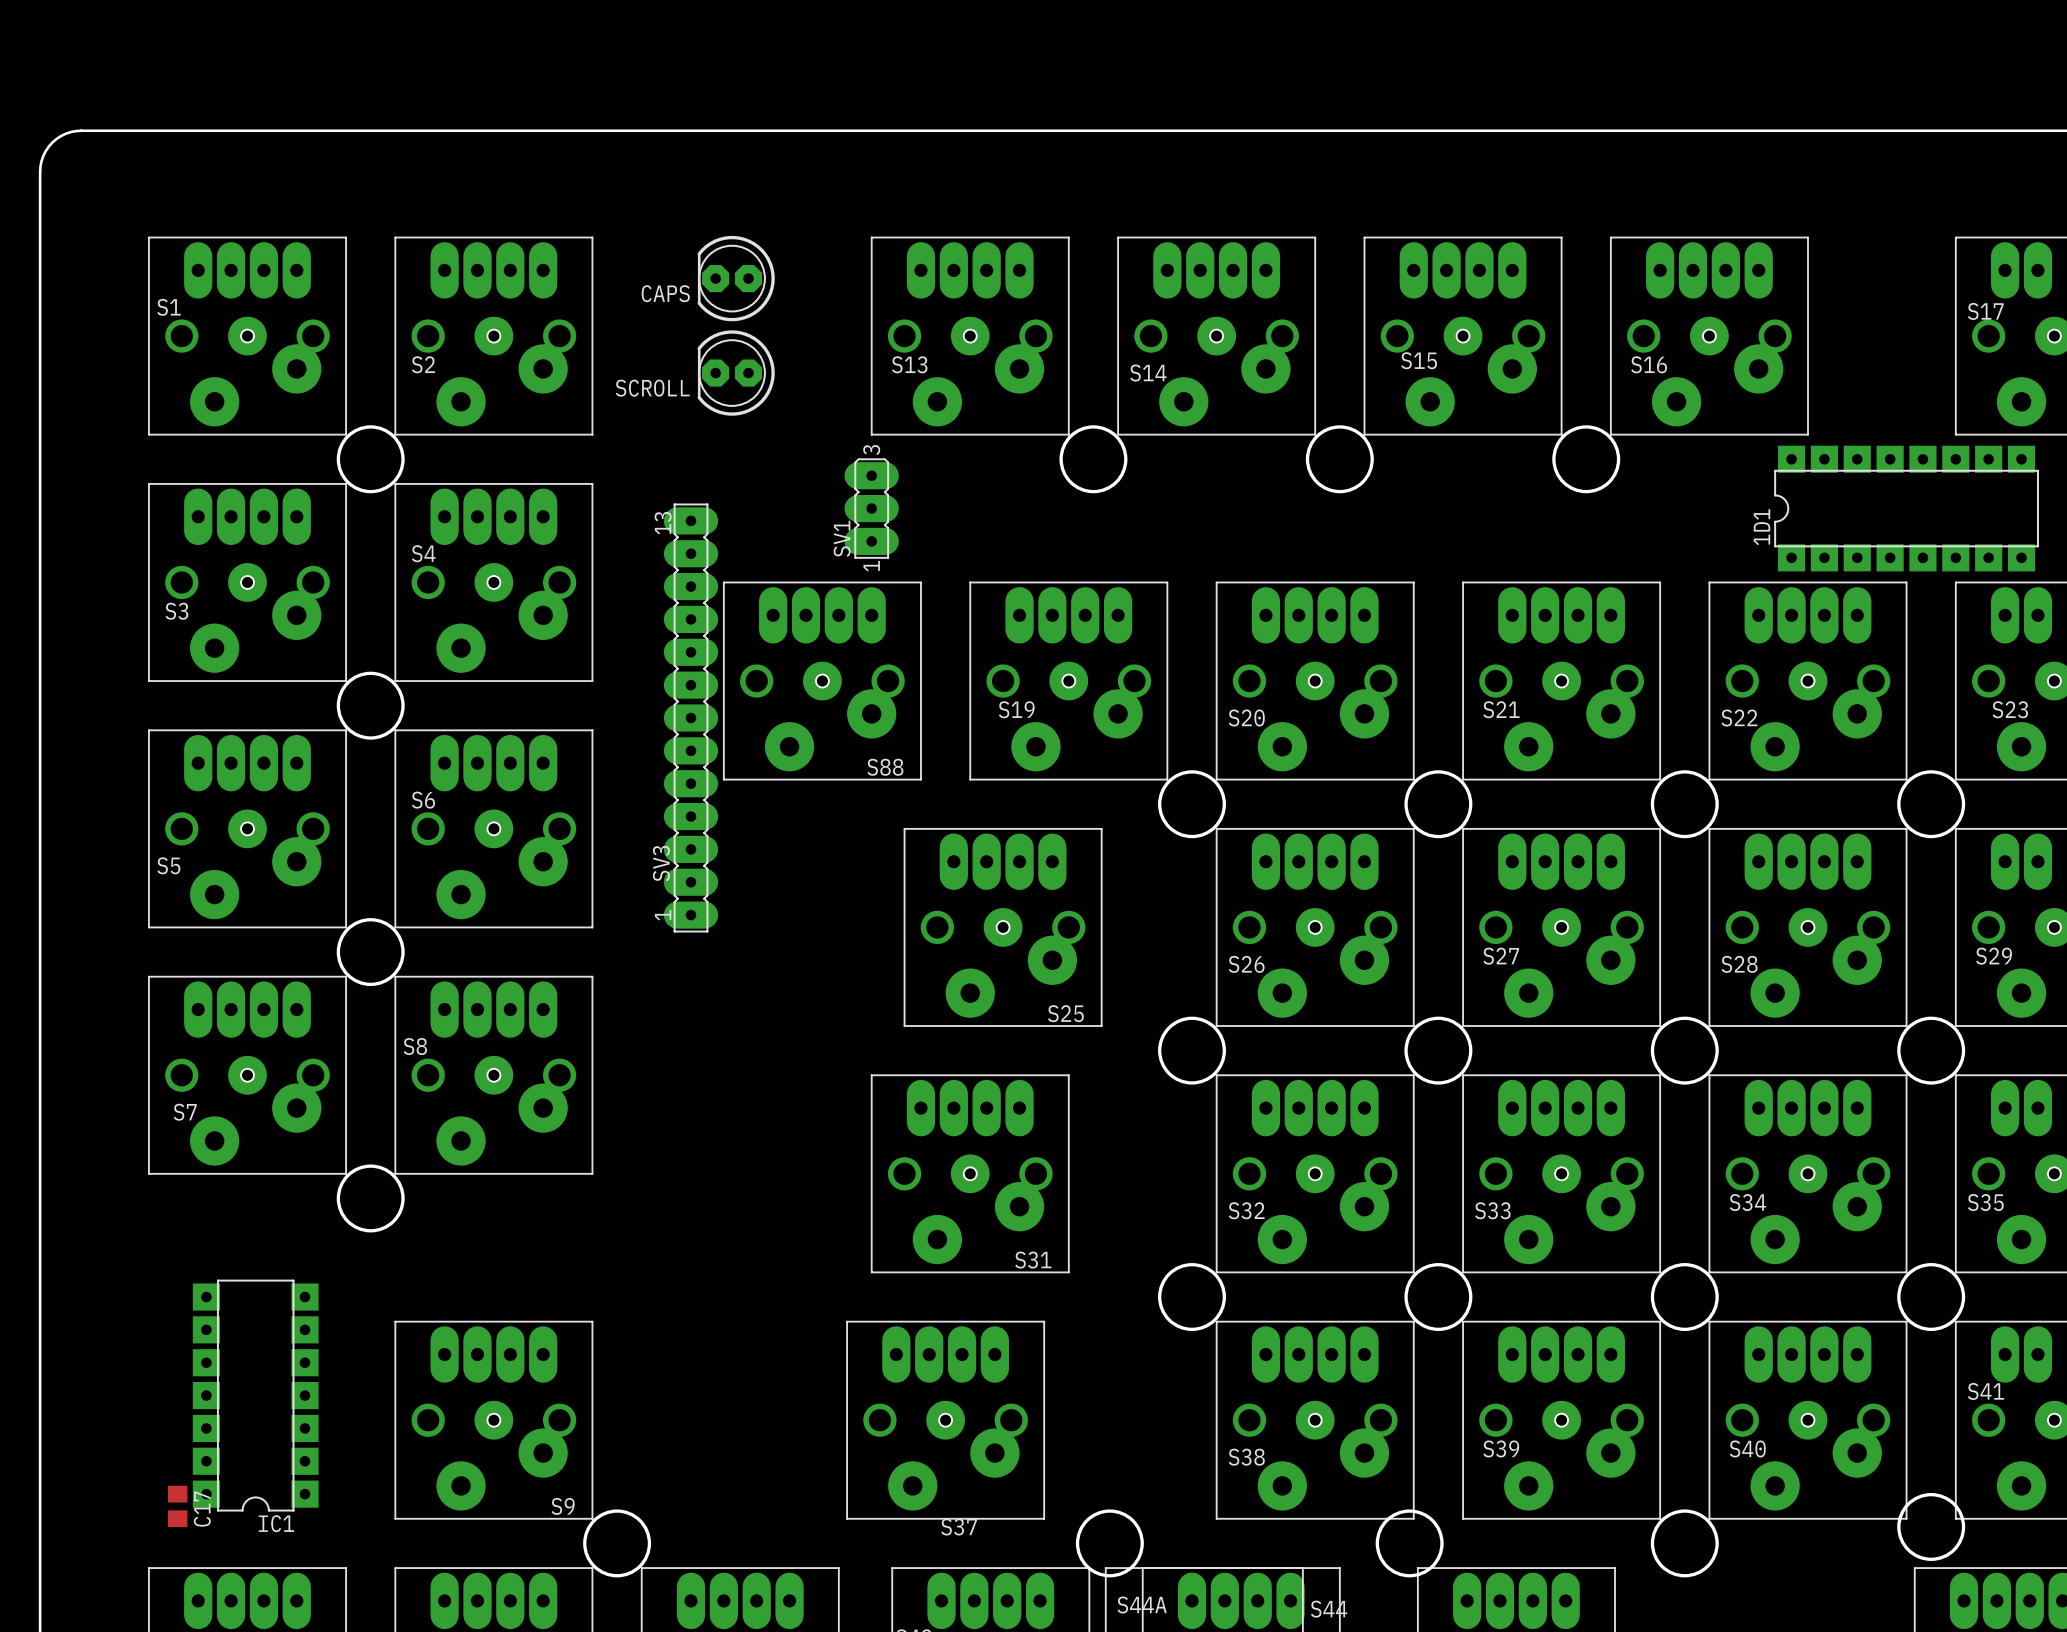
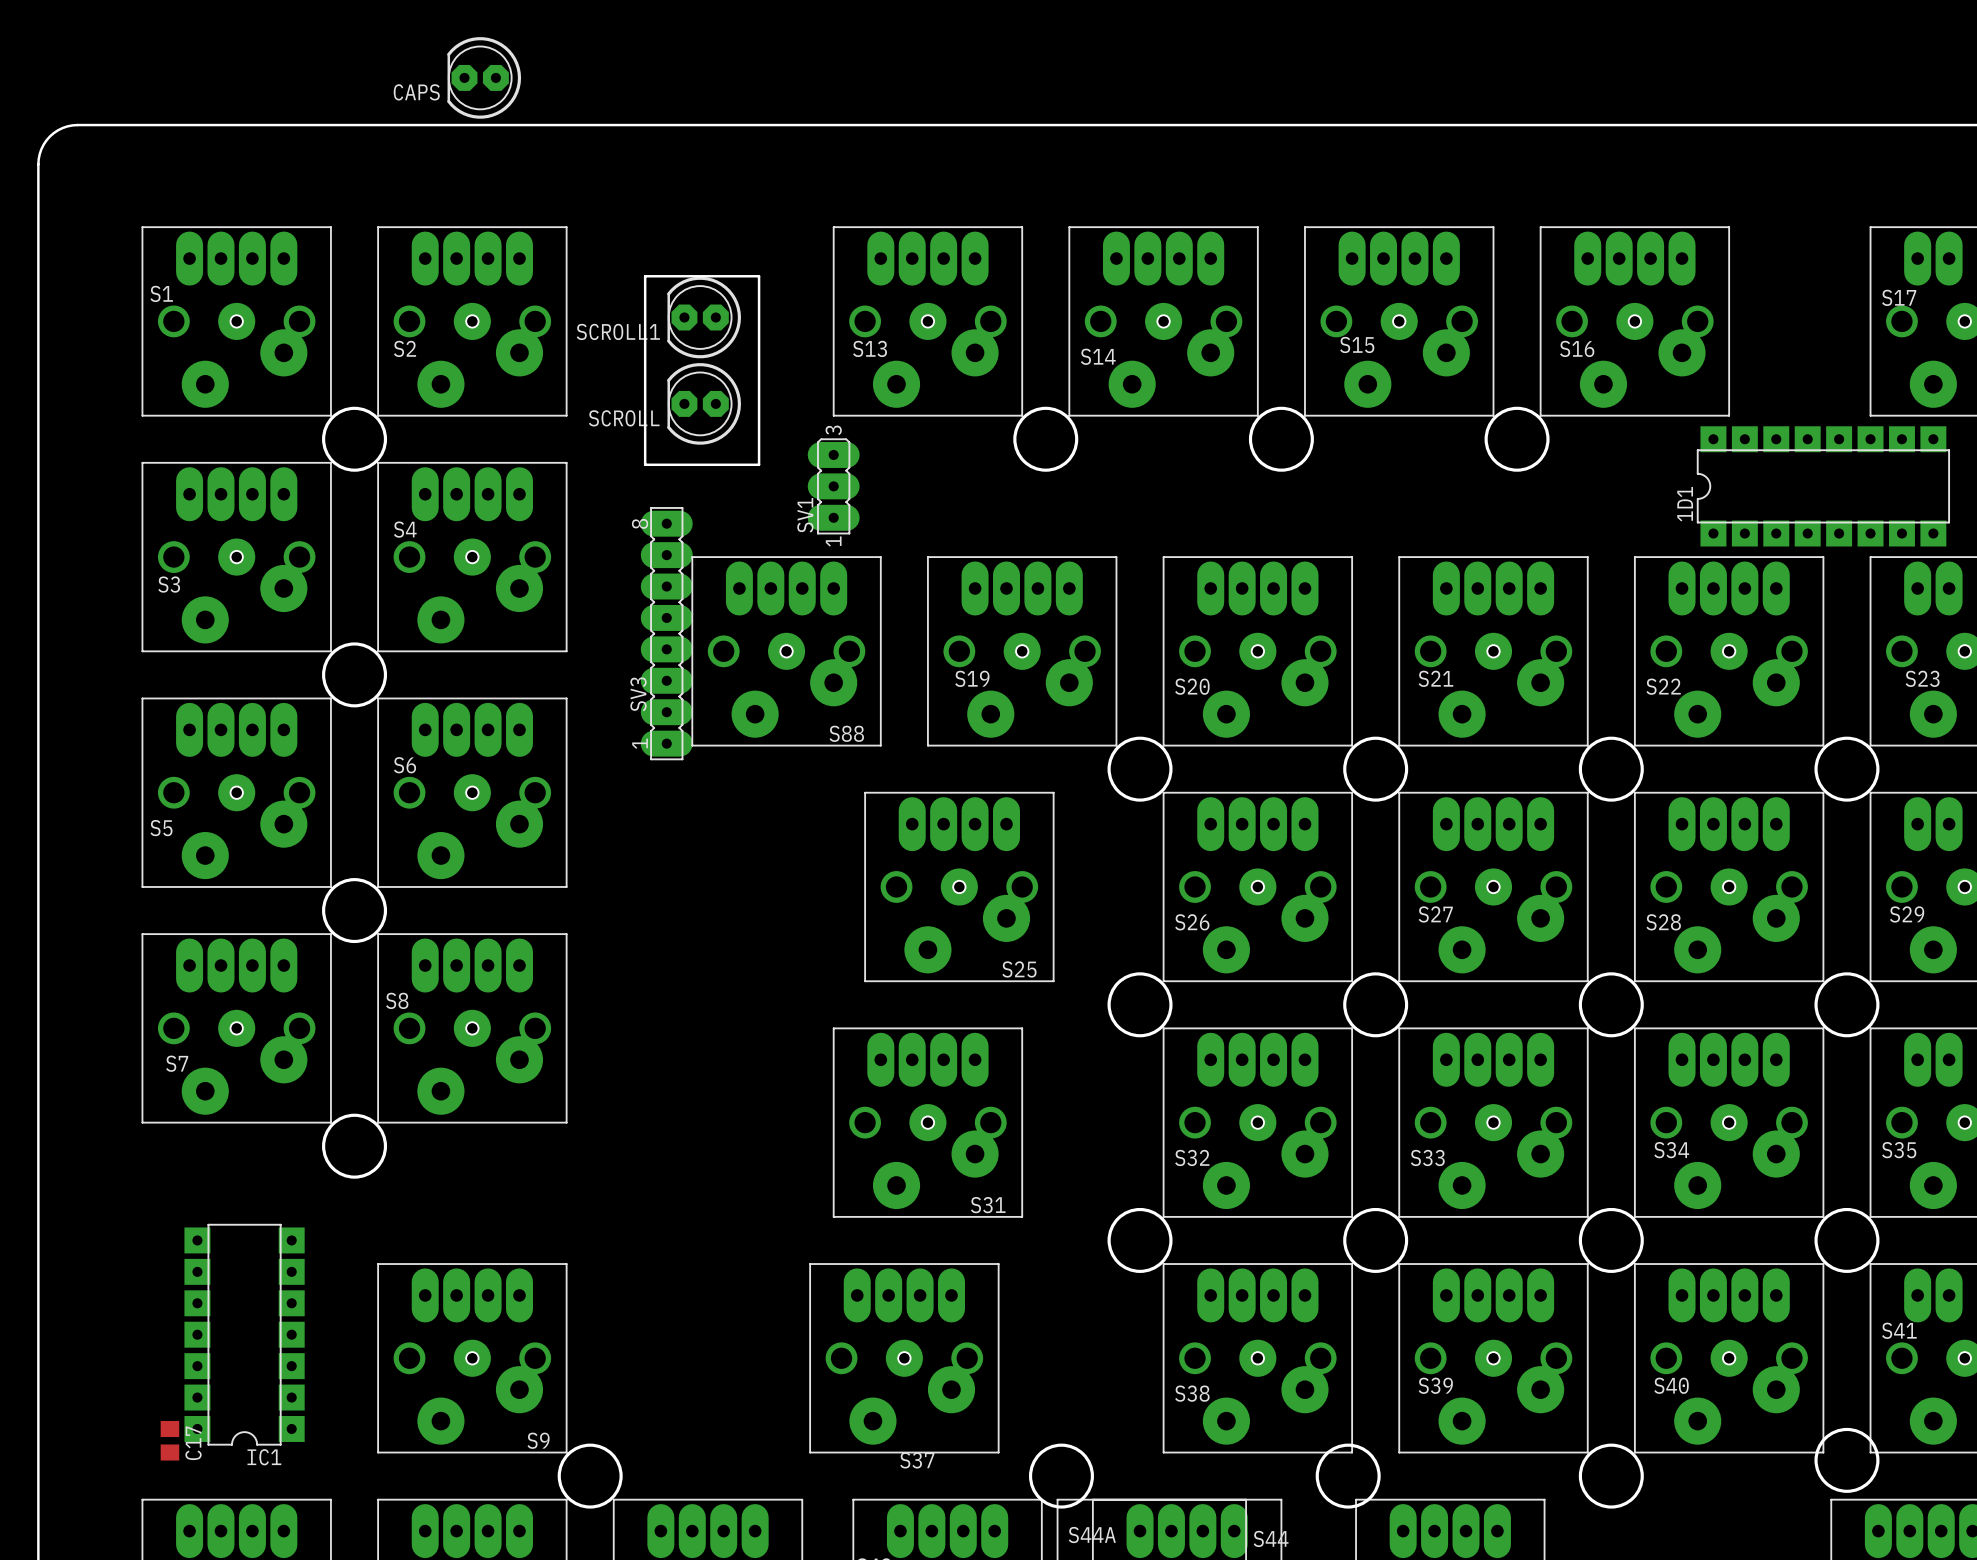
CAPS position: (736, 278) -> (484, 77)
board edge: none -> (645, 276) (759, 276) (759, 464) (645, 464) (645, 276)
SCROLL1: none -> (704, 317)
SCROLL position: (736, 373) -> (704, 403)
SV3 footprint: [663, 503, 719, 933] -> [640, 507, 693, 761]
SV3 name position: SV3 (661, 863) -> SV3 (638, 694)

